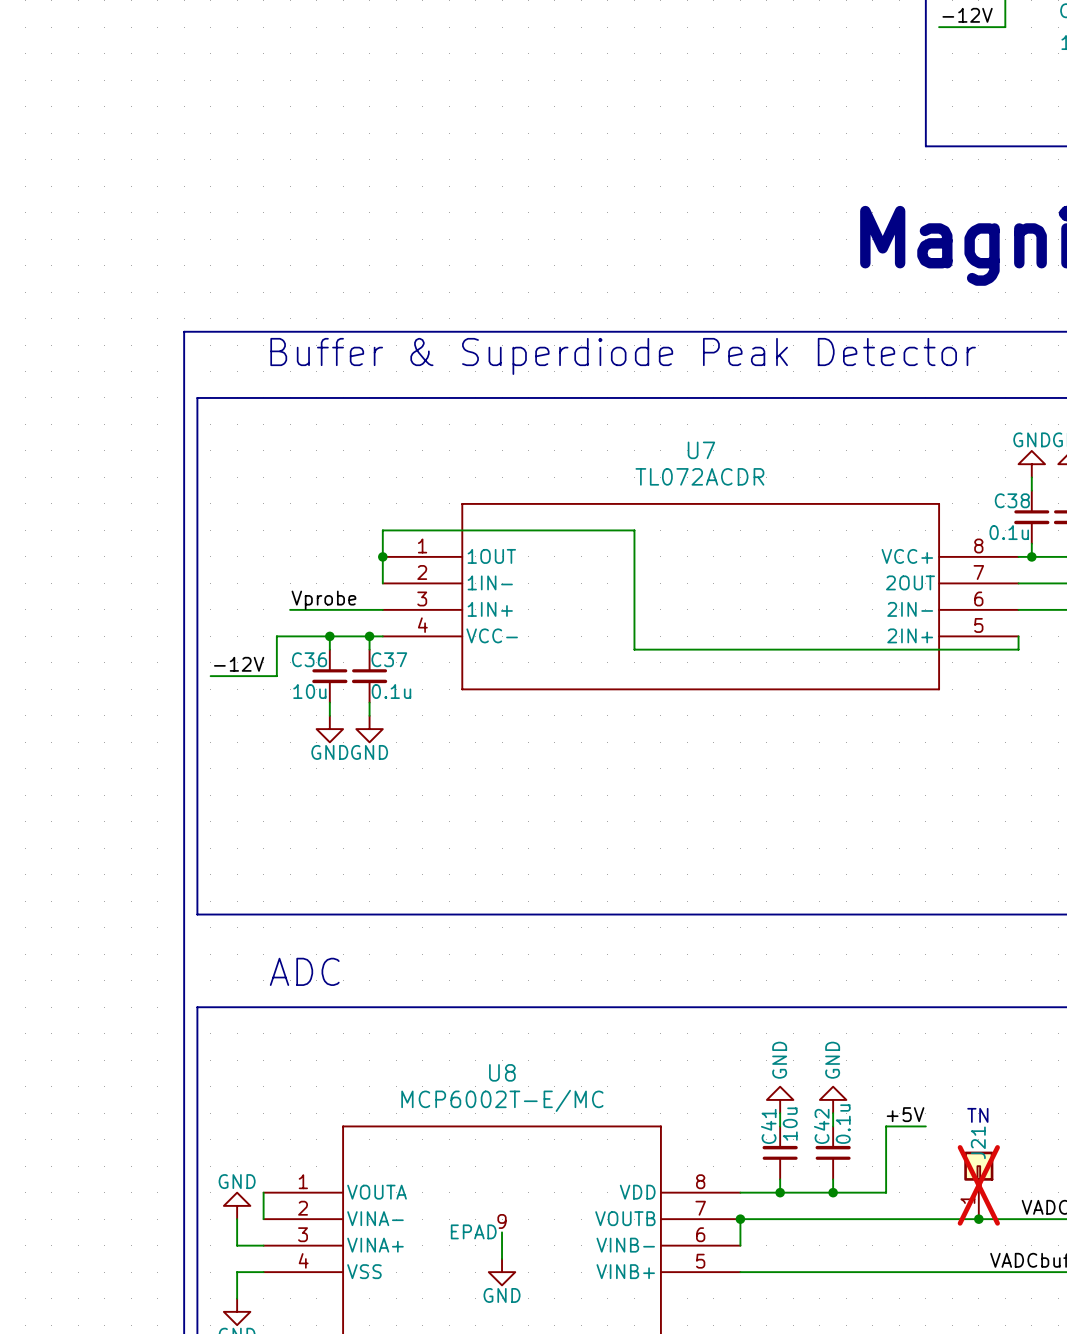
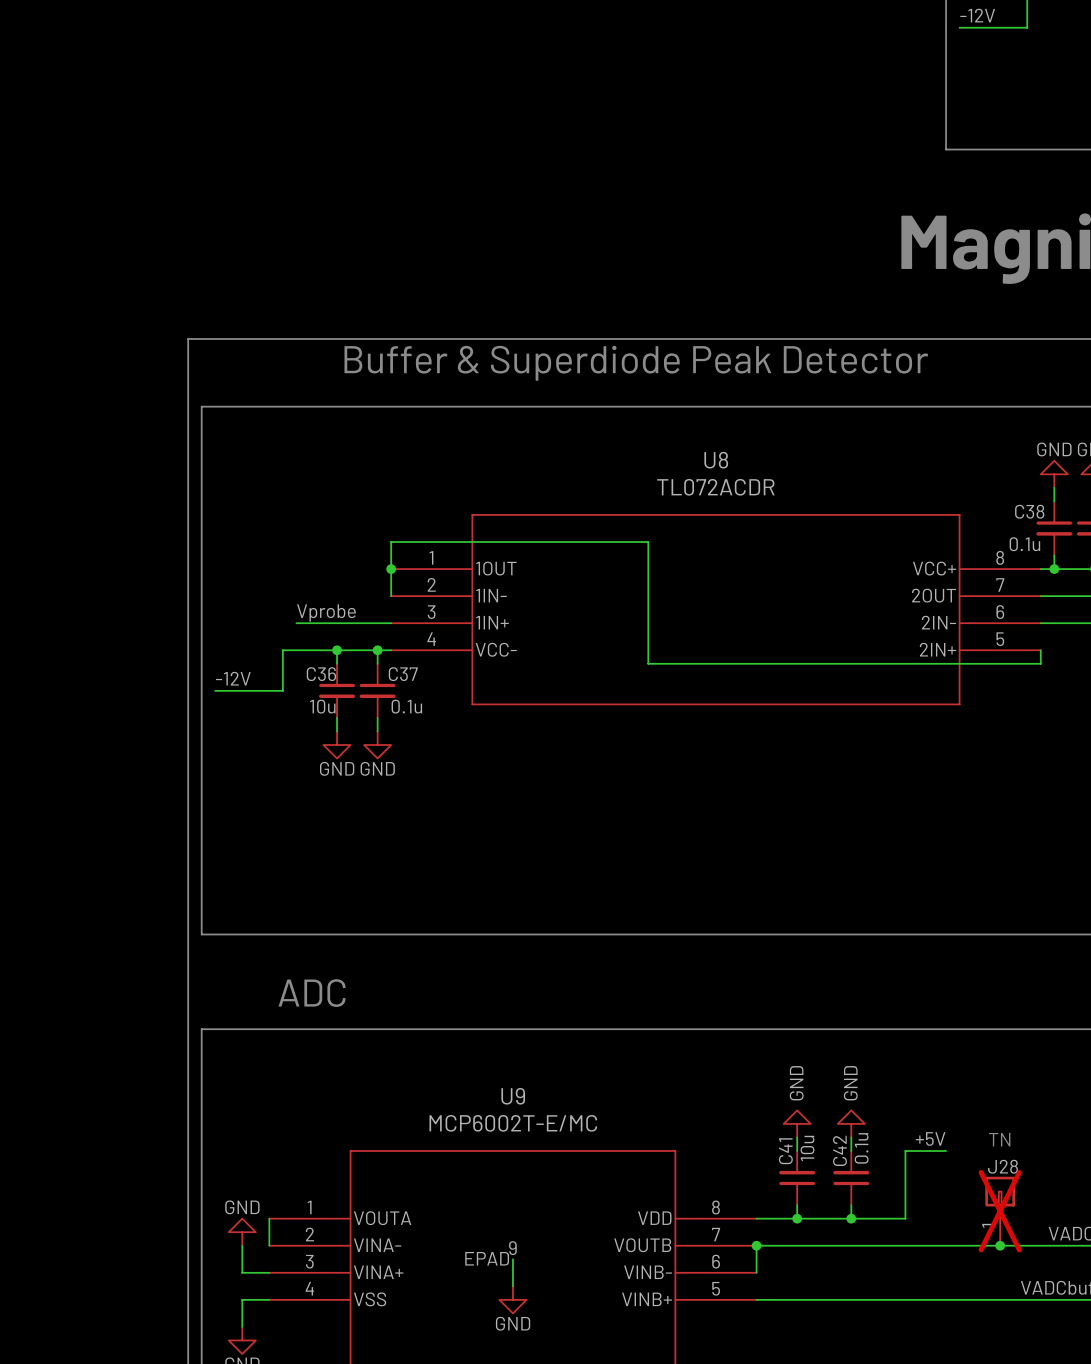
U7 name: U7 (701, 450) -> U8 (716, 460)
U8 name: U8 (502, 1072) -> U9 (513, 1096)
J21 name: J21 (978, 1142) -> J28 (1003, 1166)

